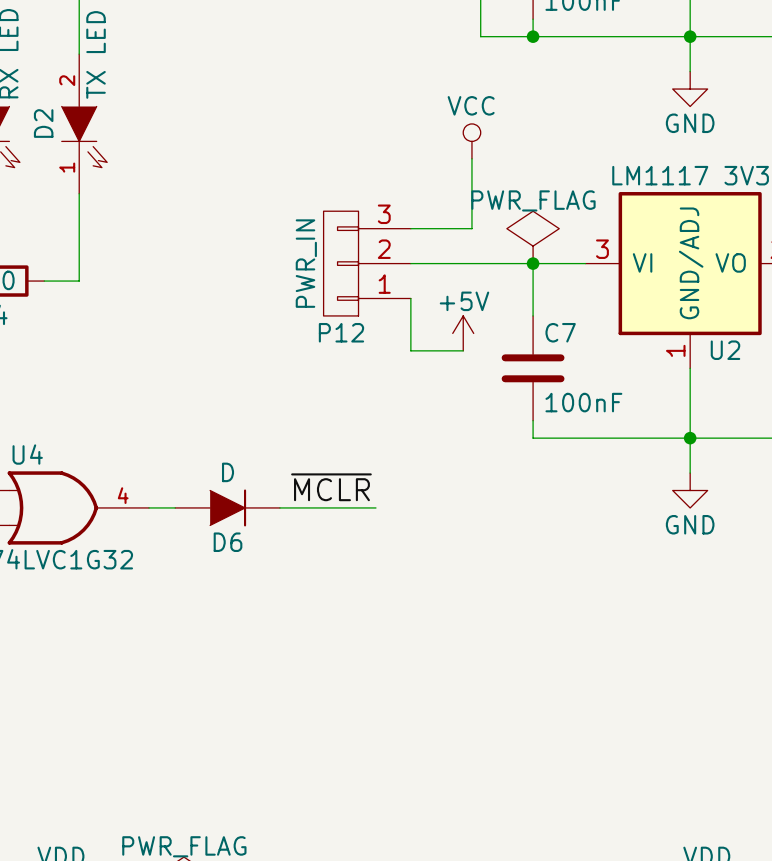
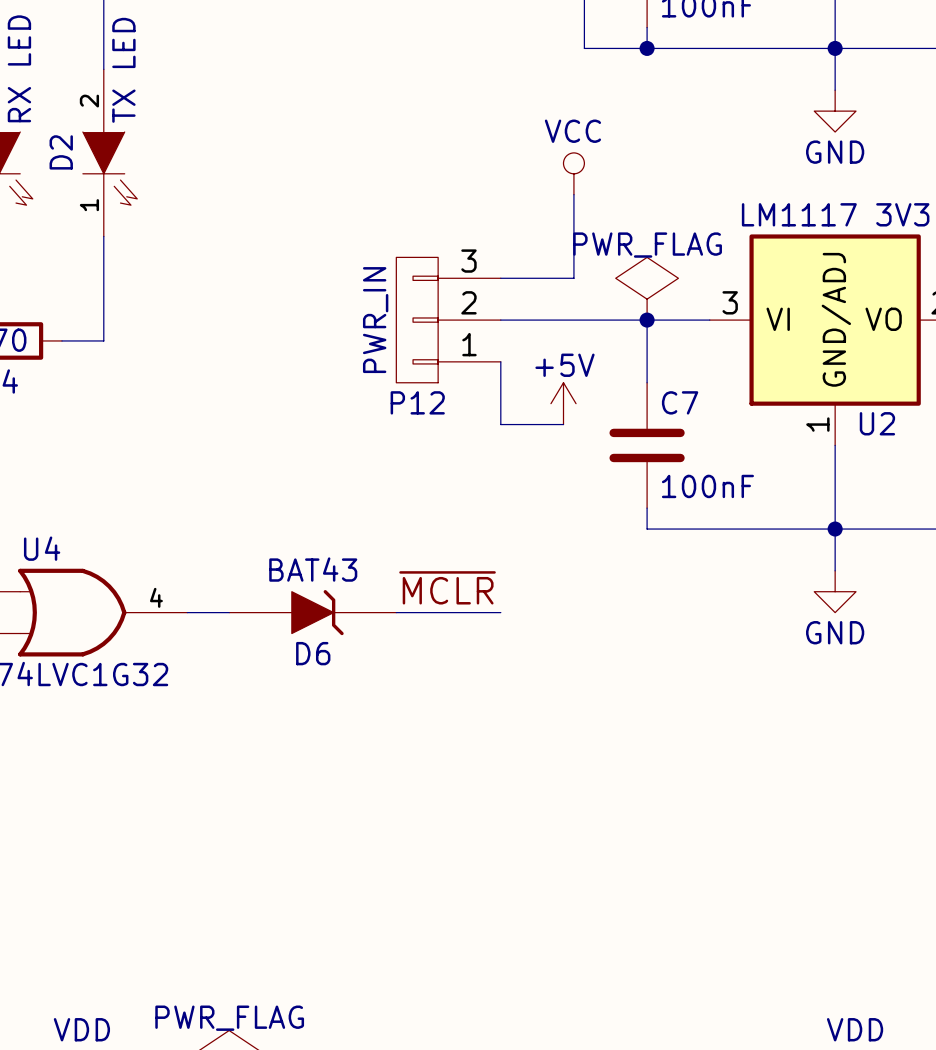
D6 value: D (228, 472) -> BAT43 (313, 569)
label position: ~{MCLR} (331, 487) -> ~{MCLR} (447, 587)
D6 symbol: [175, 489, 280, 527] -> [229, 590, 397, 636]
wire: none -> (459, 612) (500, 612)

